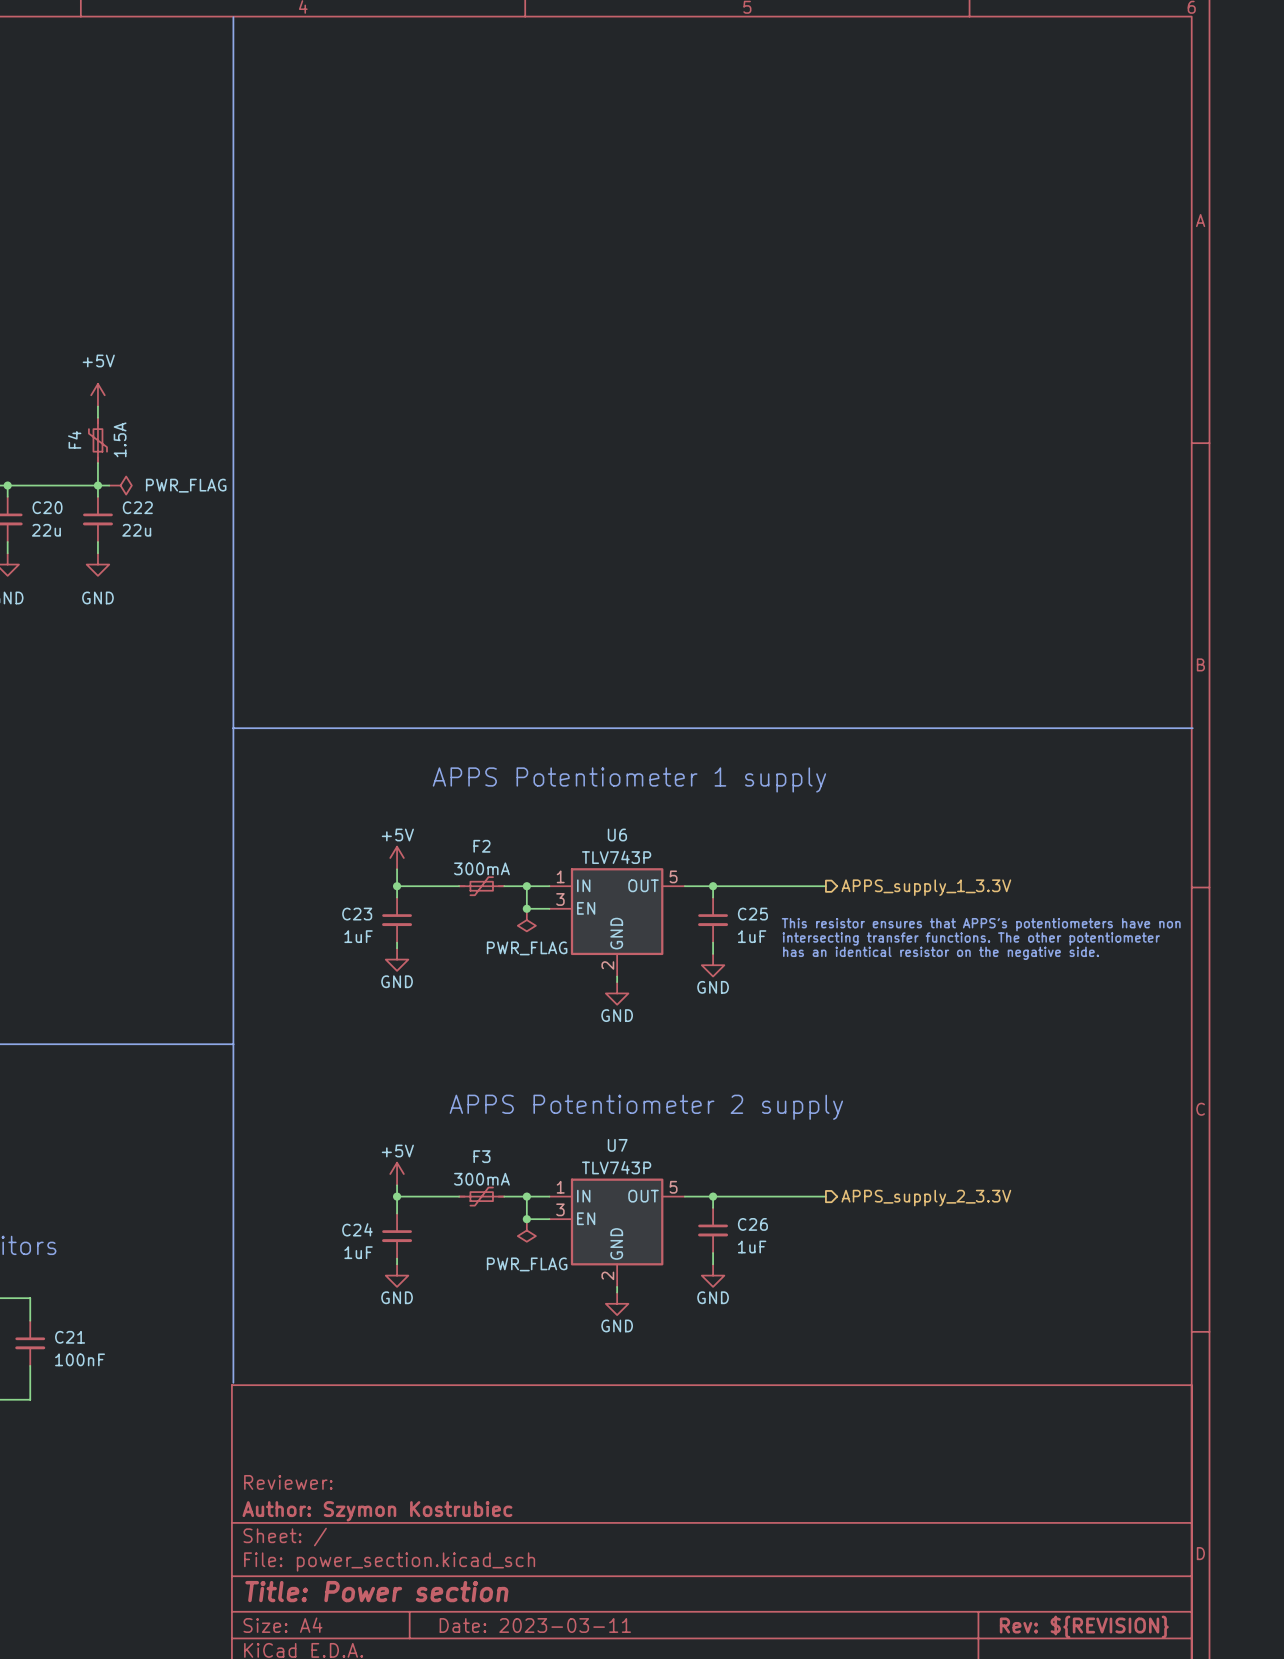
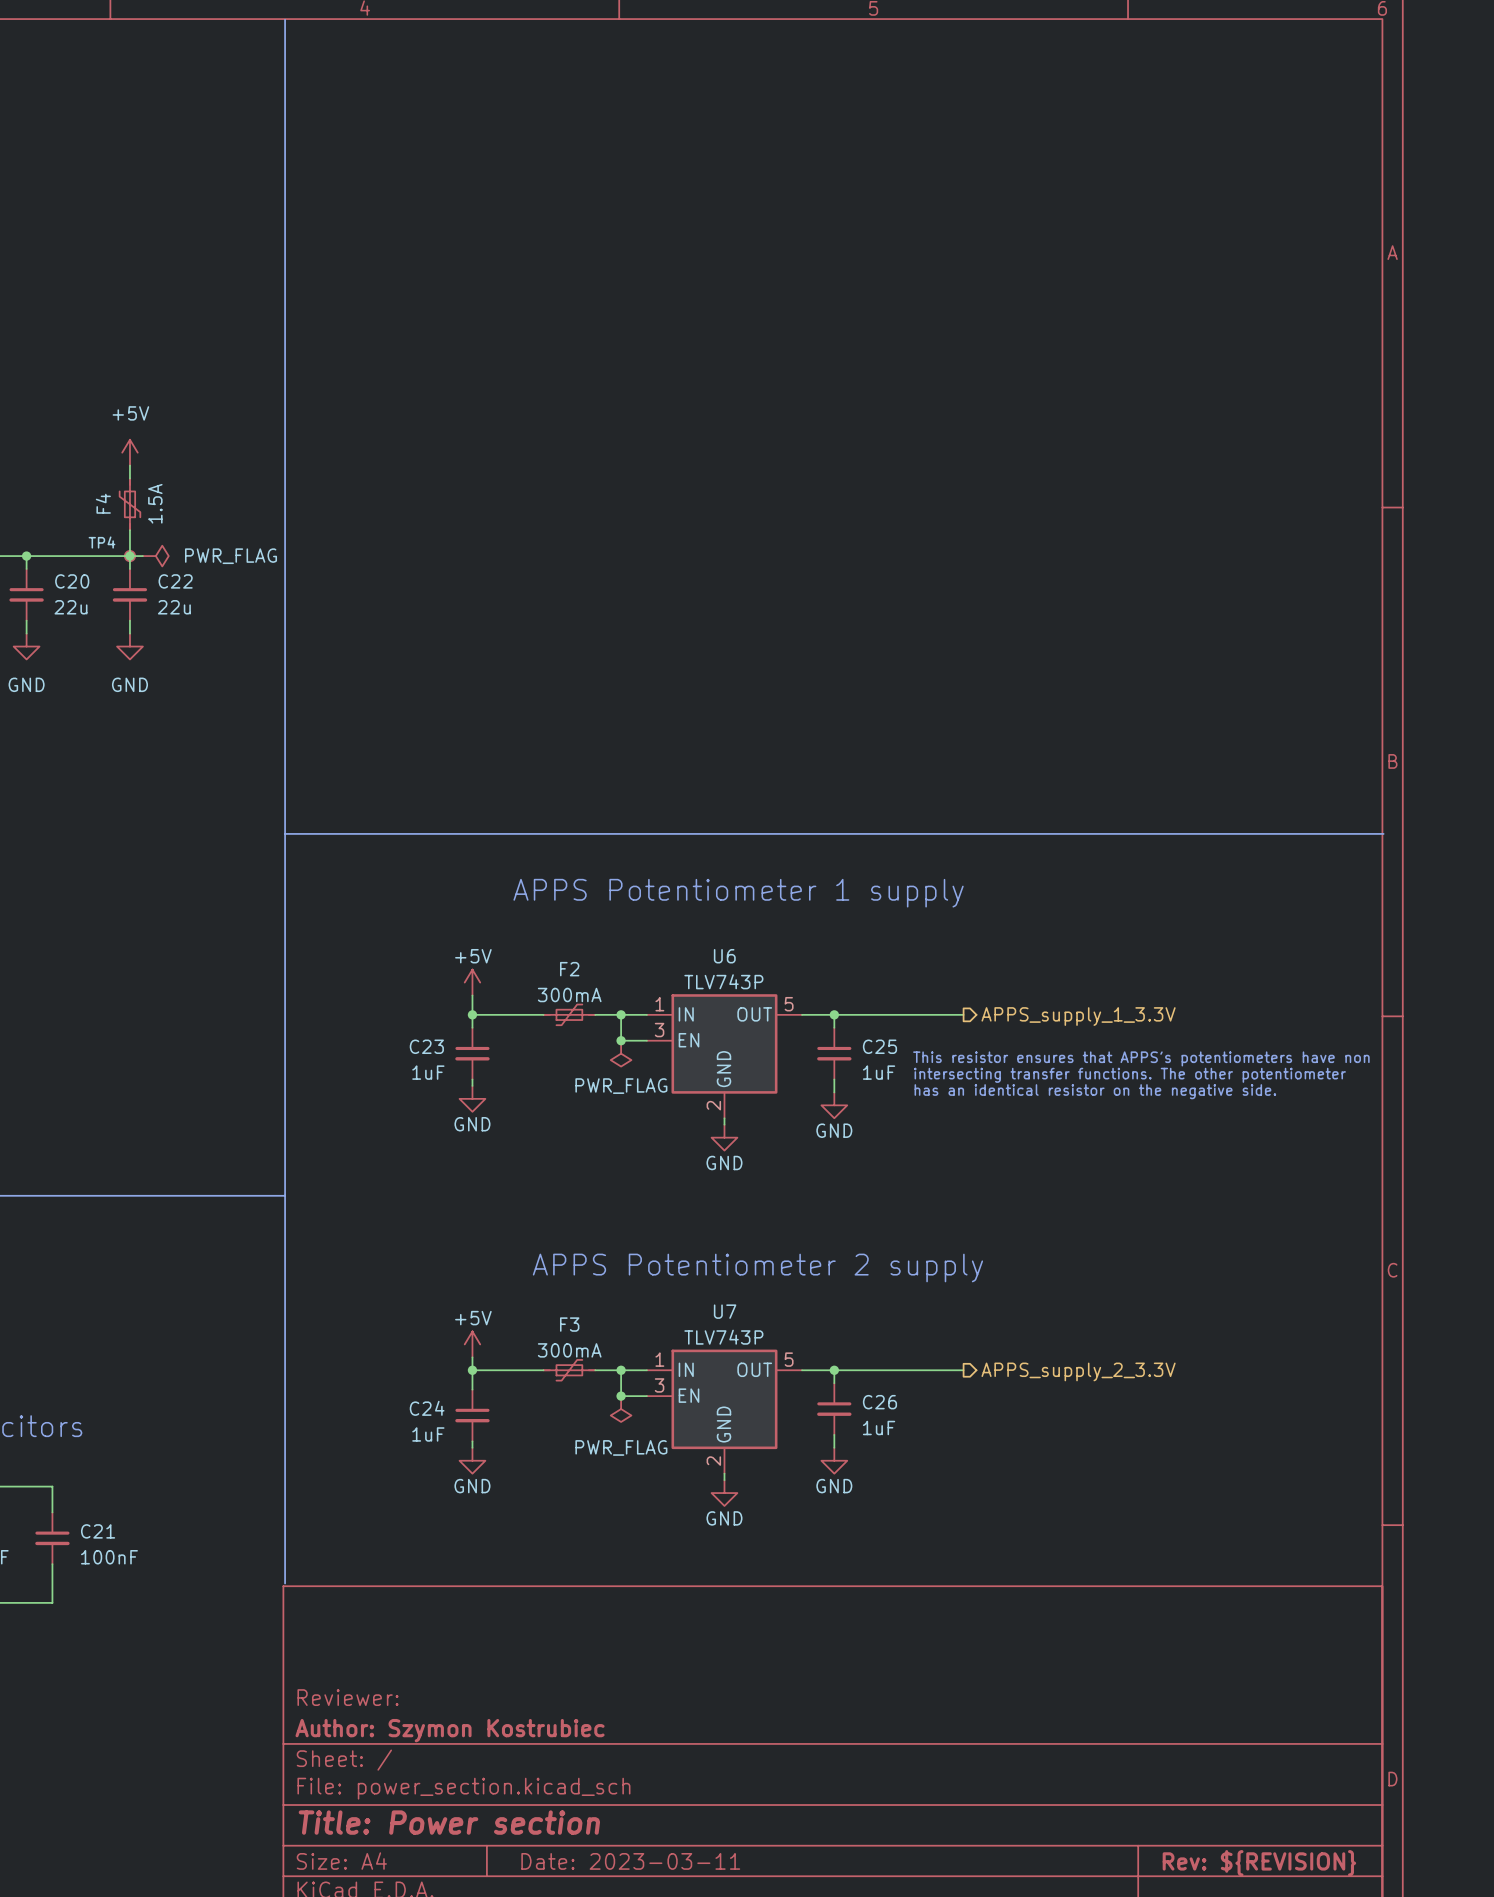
TP4: none -> (129, 556)

